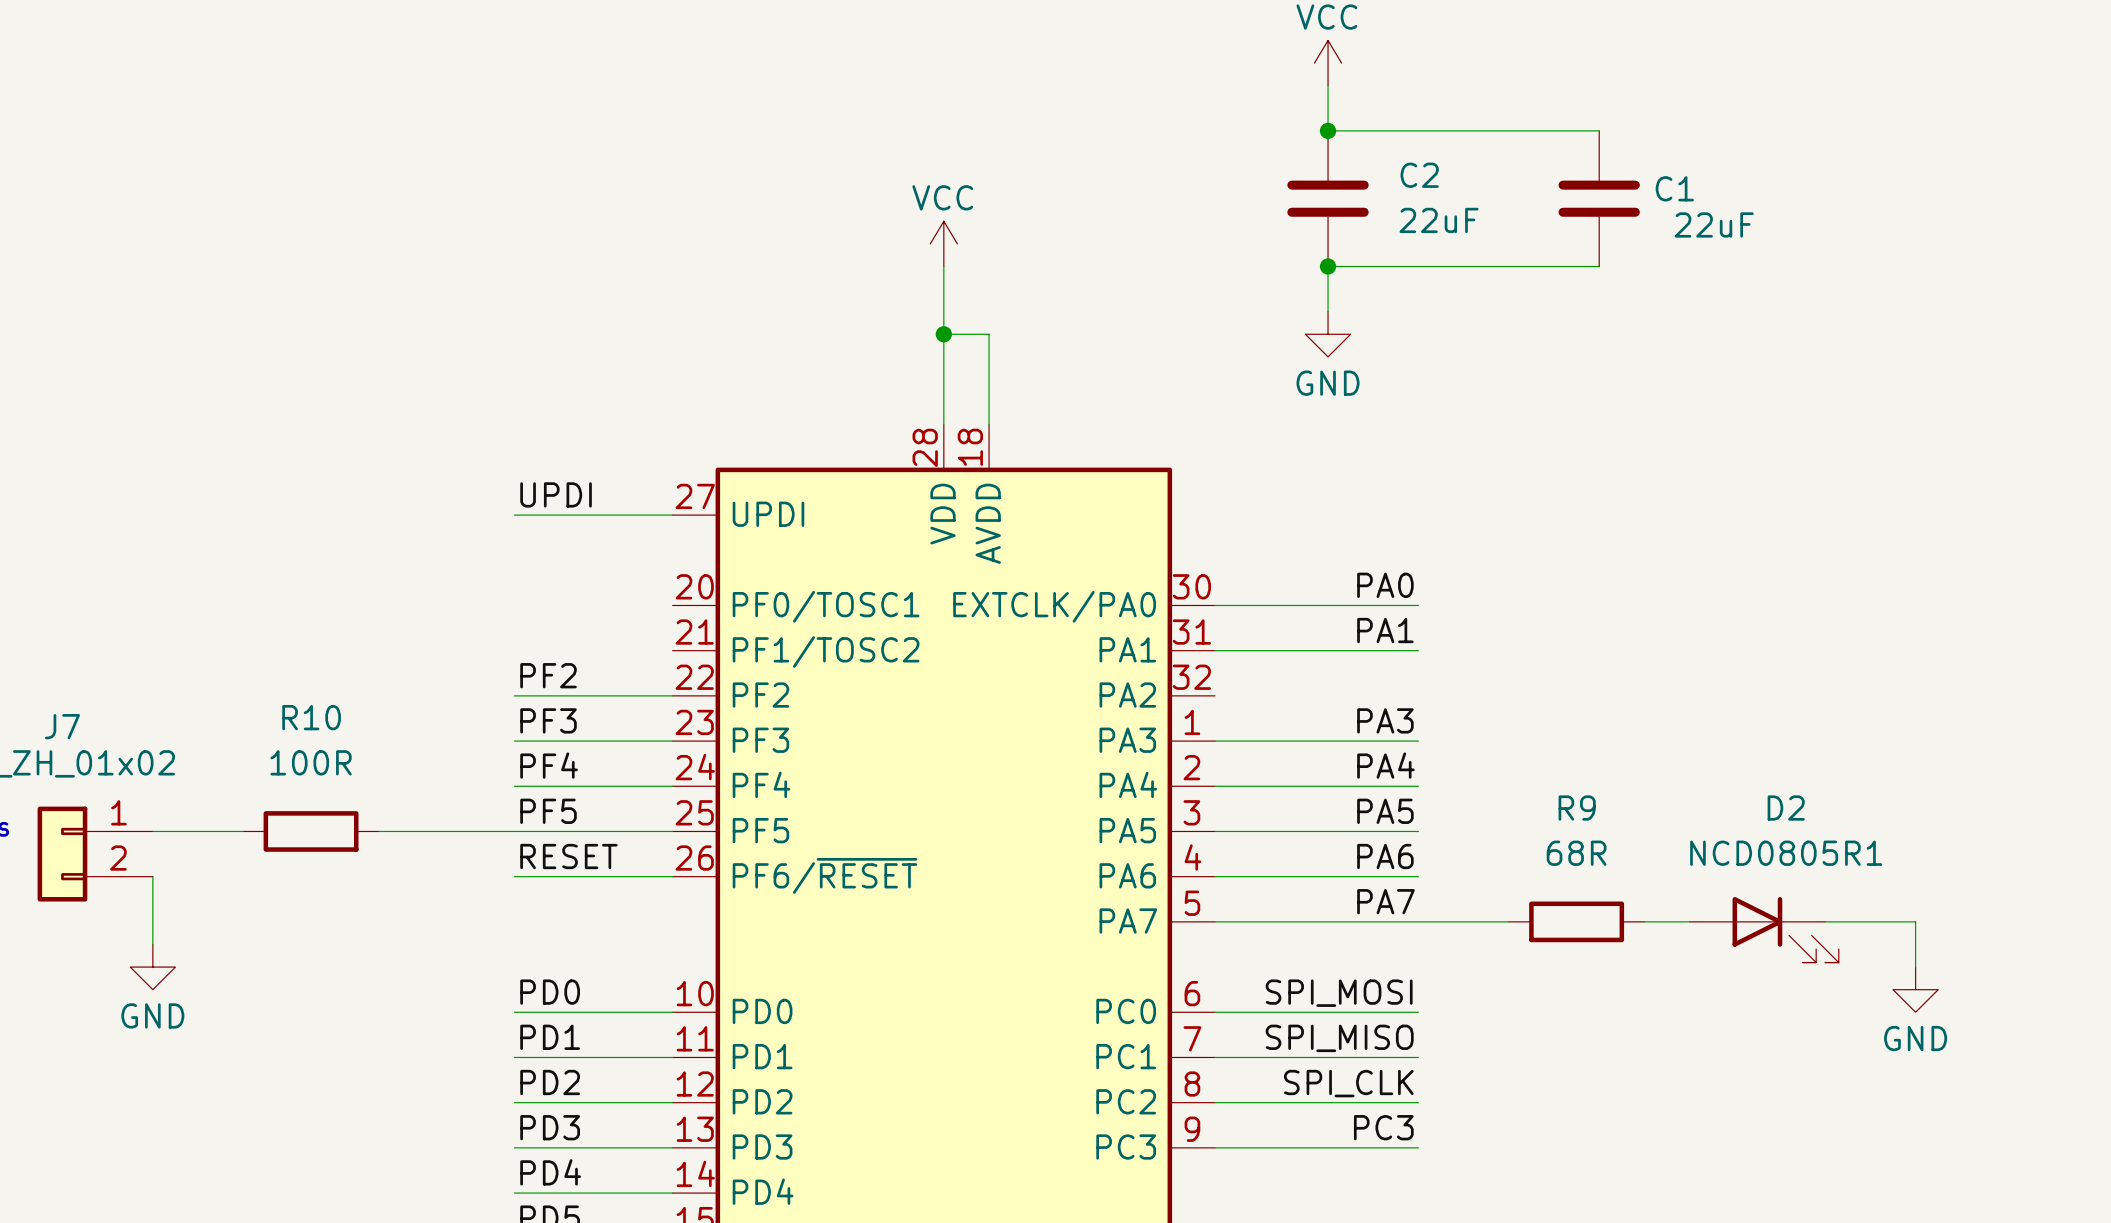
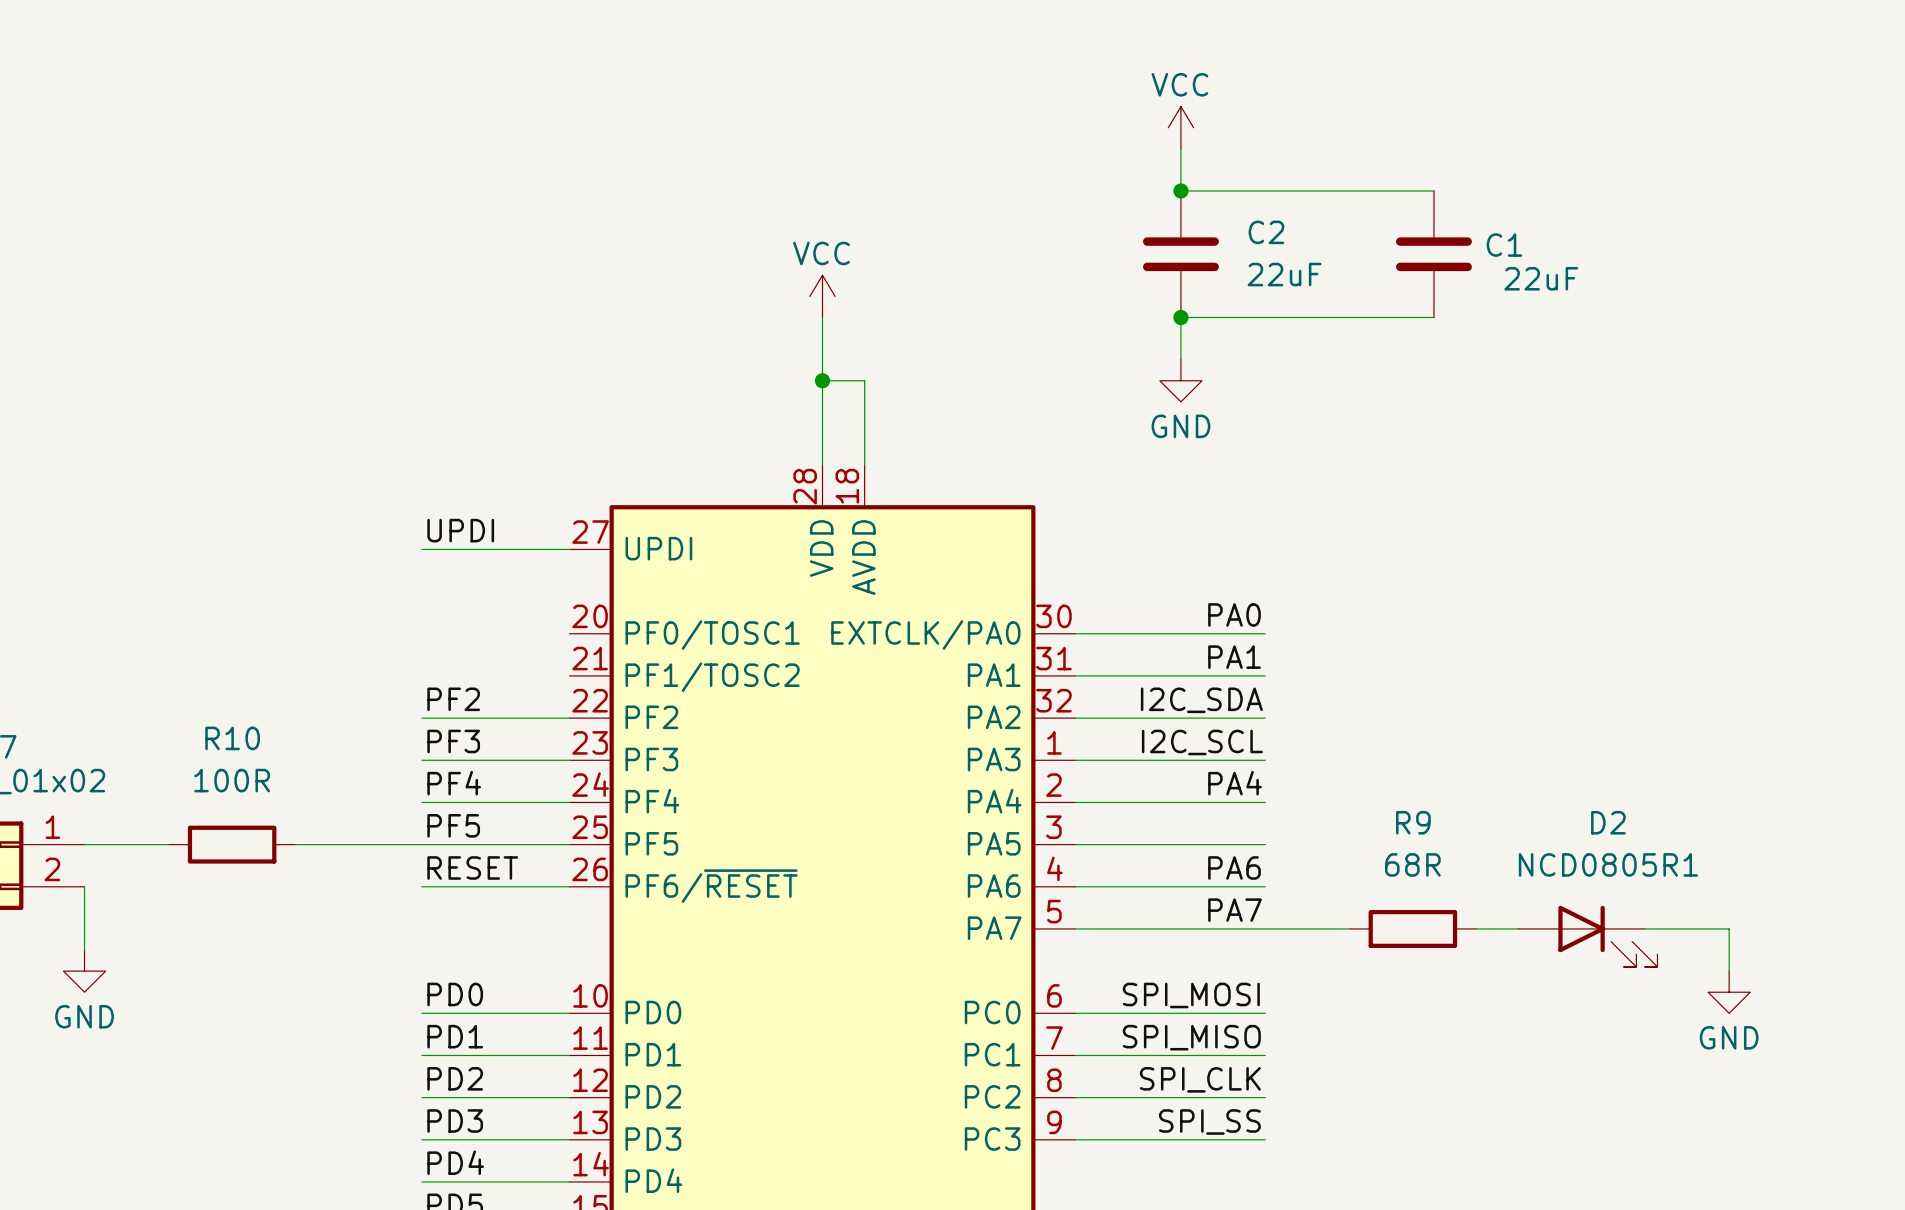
label: none -> I2C_SDA (1201, 700)
wire: none -> (1075, 718) (1265, 718)
label: PA3 (1385, 720) -> I2C_SCL (1202, 742)
label: PA5 (1385, 811) -> none
label: PC3 (1383, 1127) -> SPI_SS (1209, 1122)

